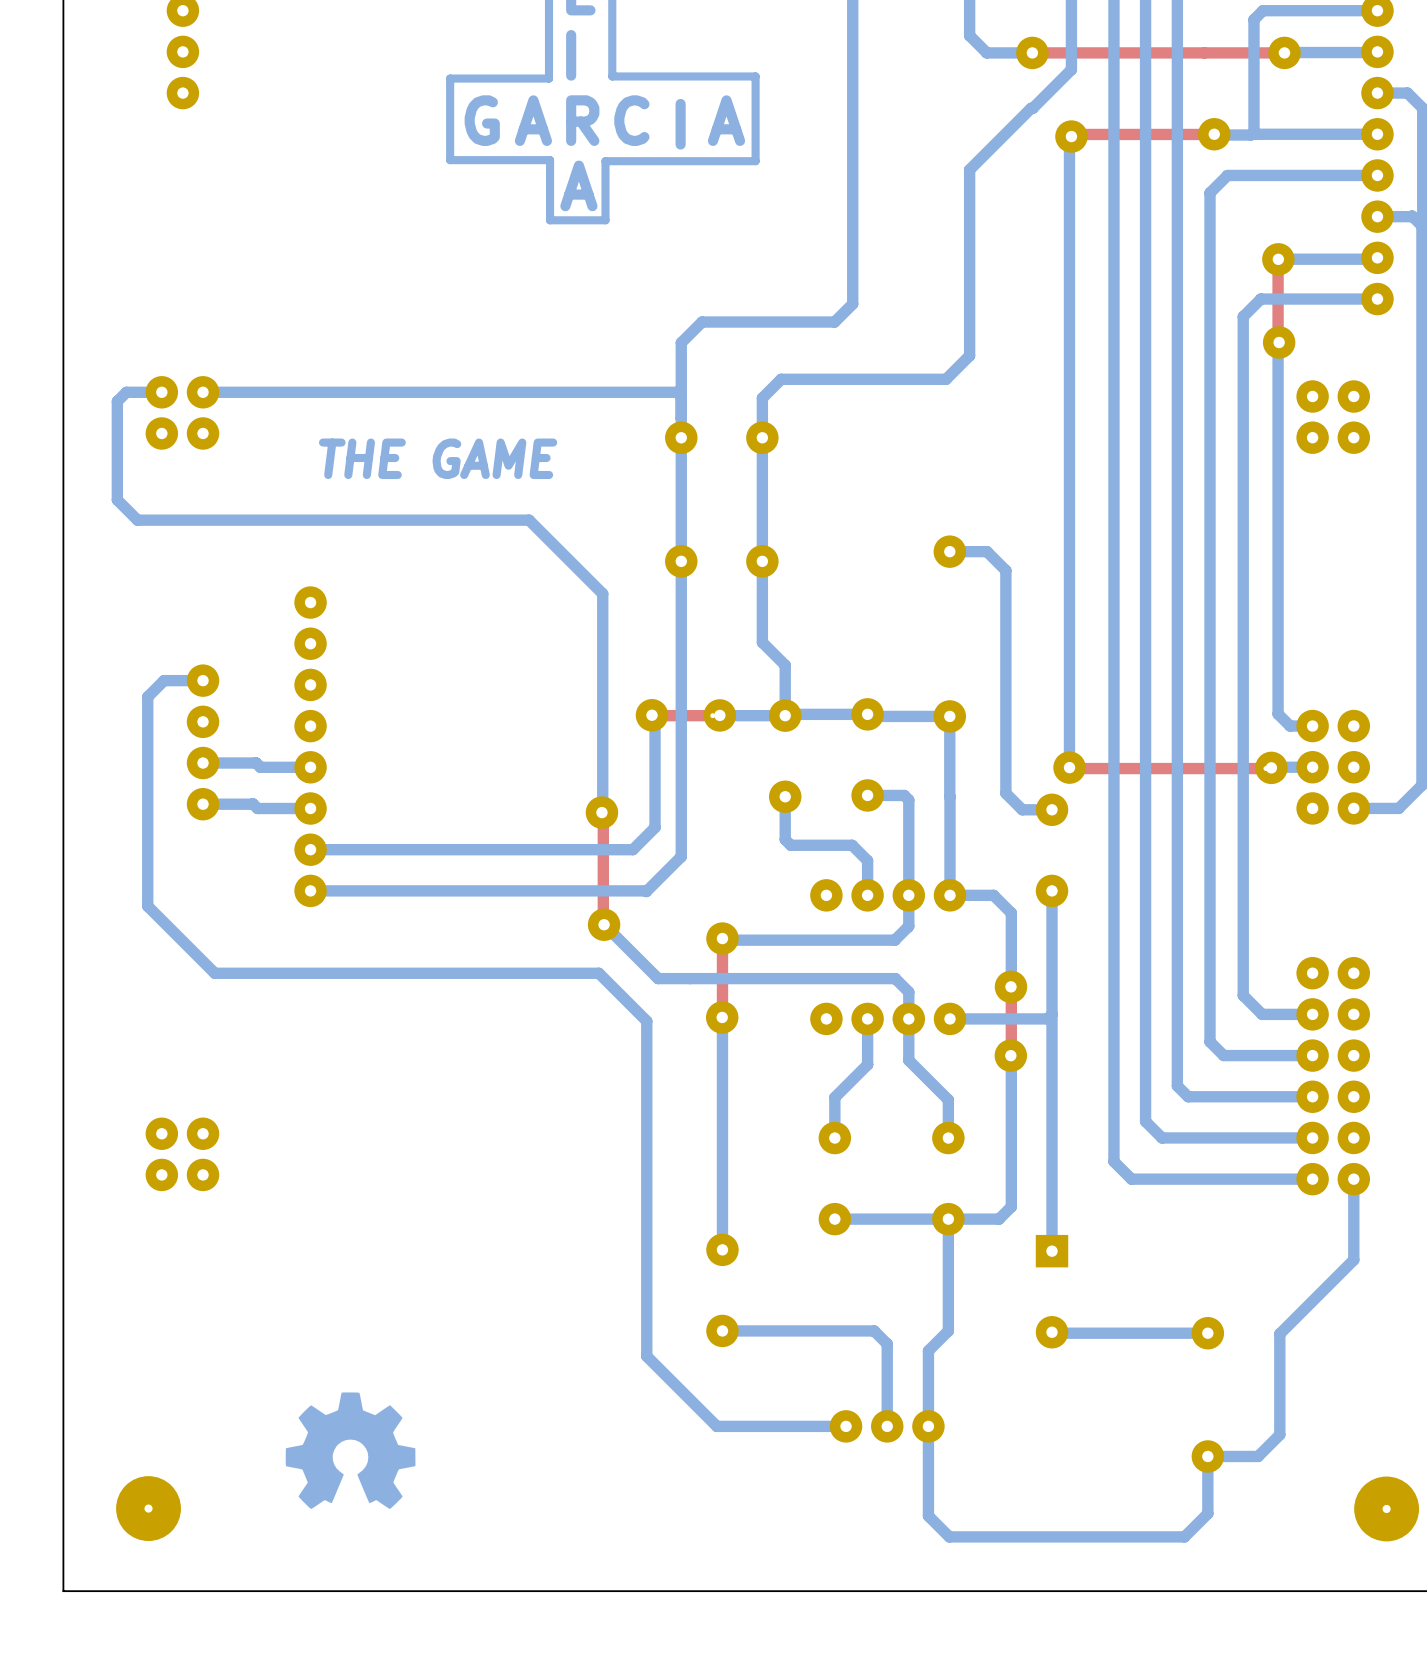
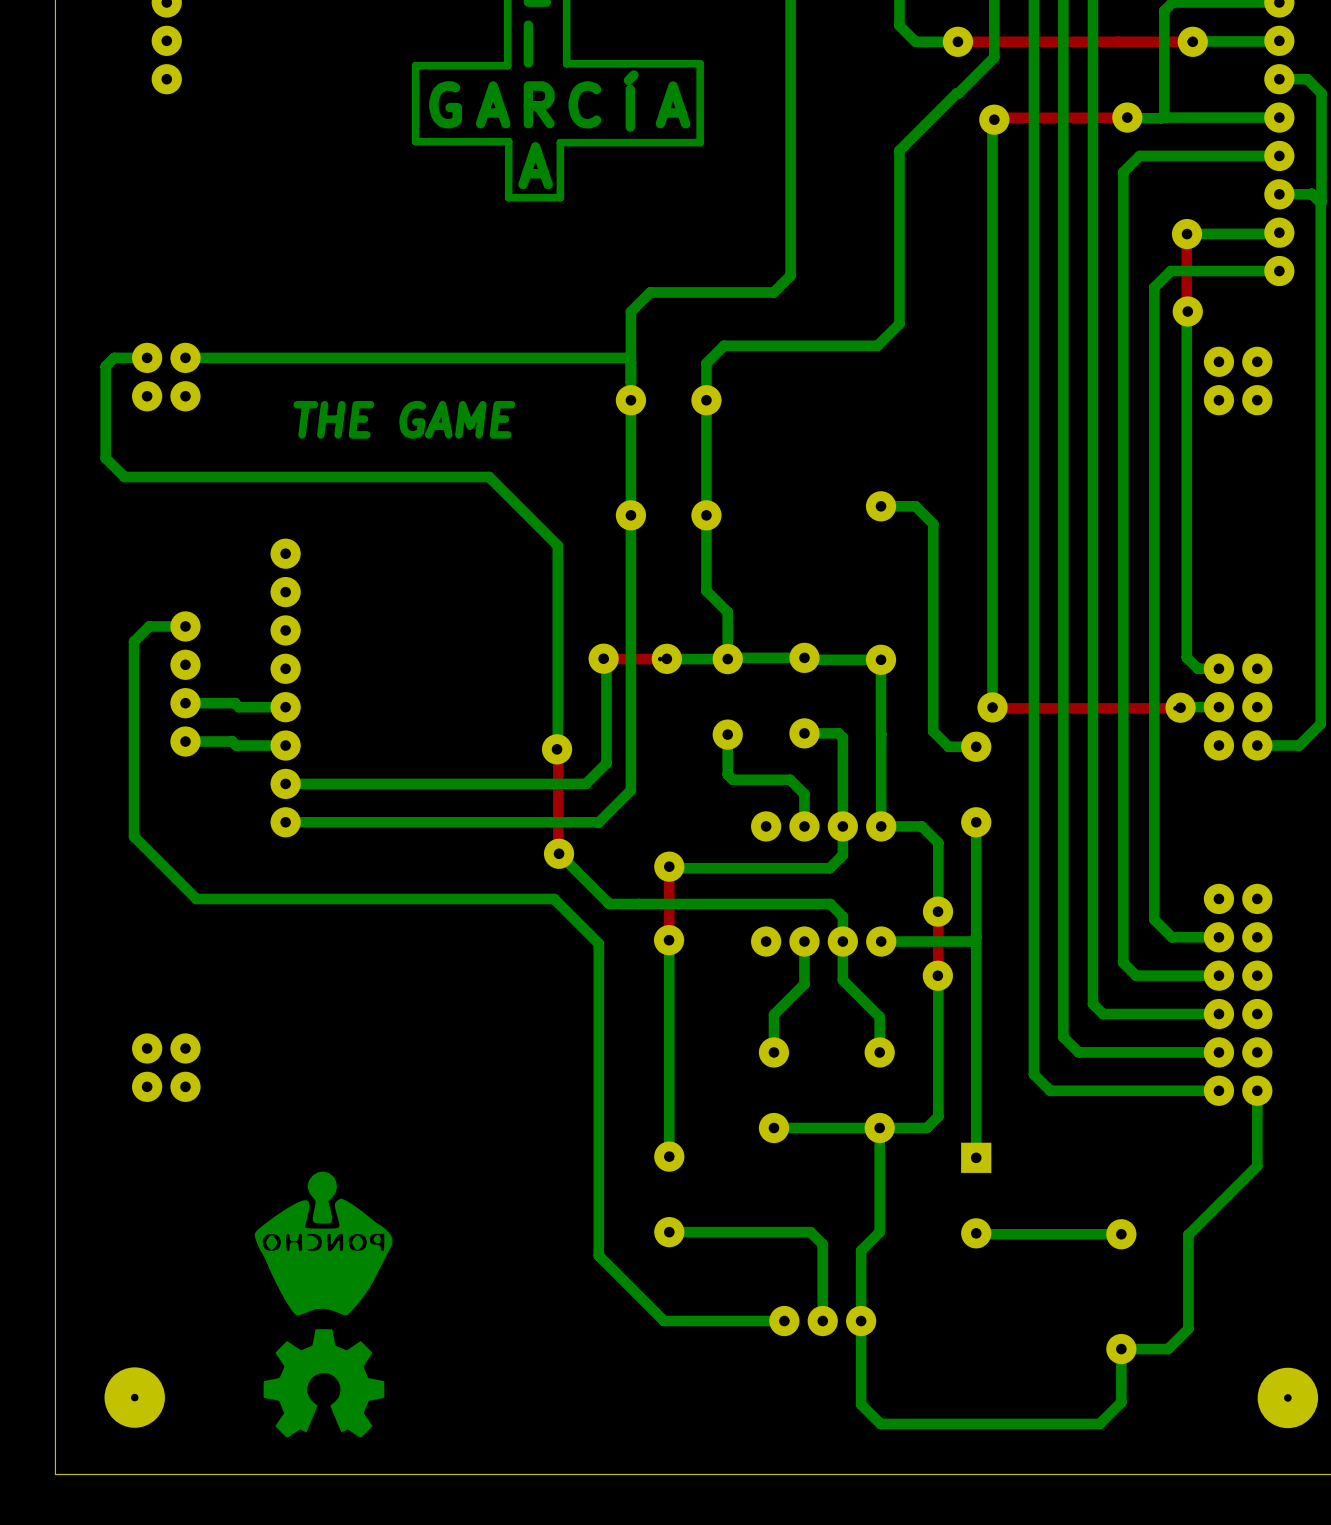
text: I (680, 124) -> Í (631, 101)
drawing: none -> [254, 1171, 393, 1316]
drawing position: (350, 1450) -> (324, 1383)

